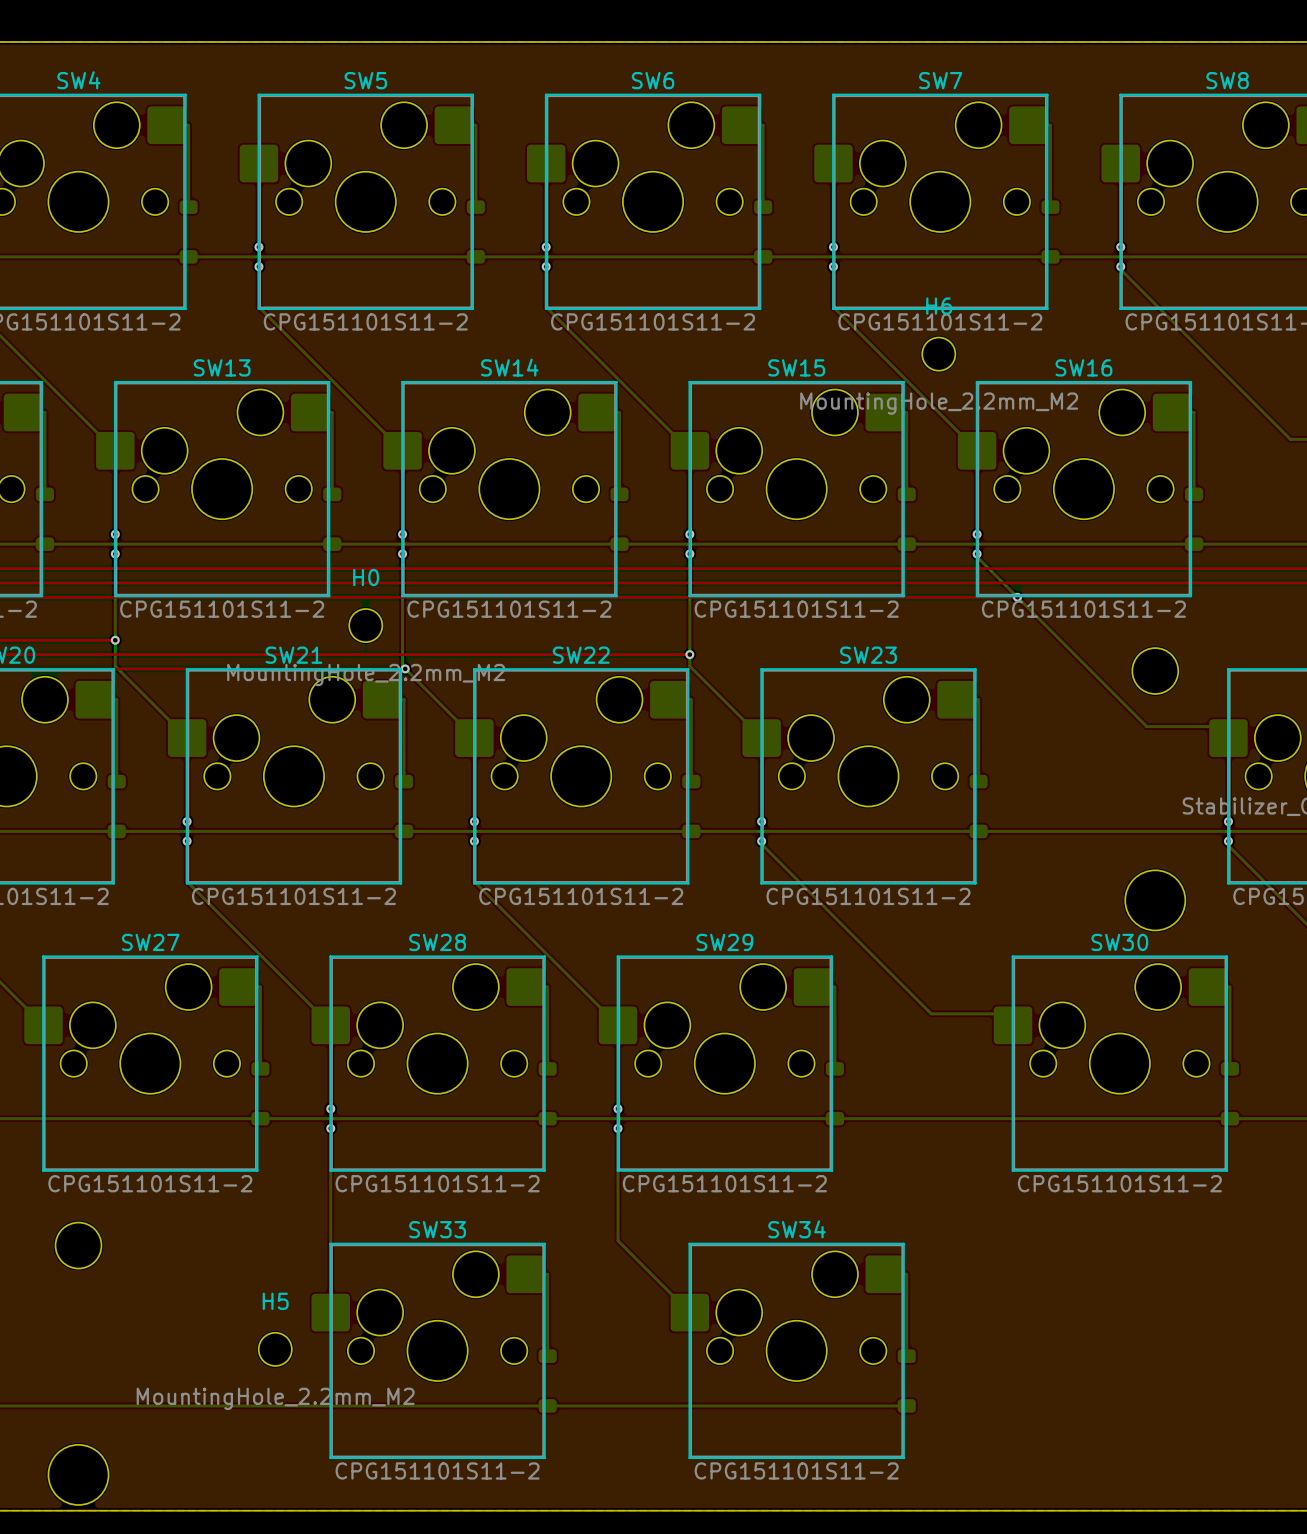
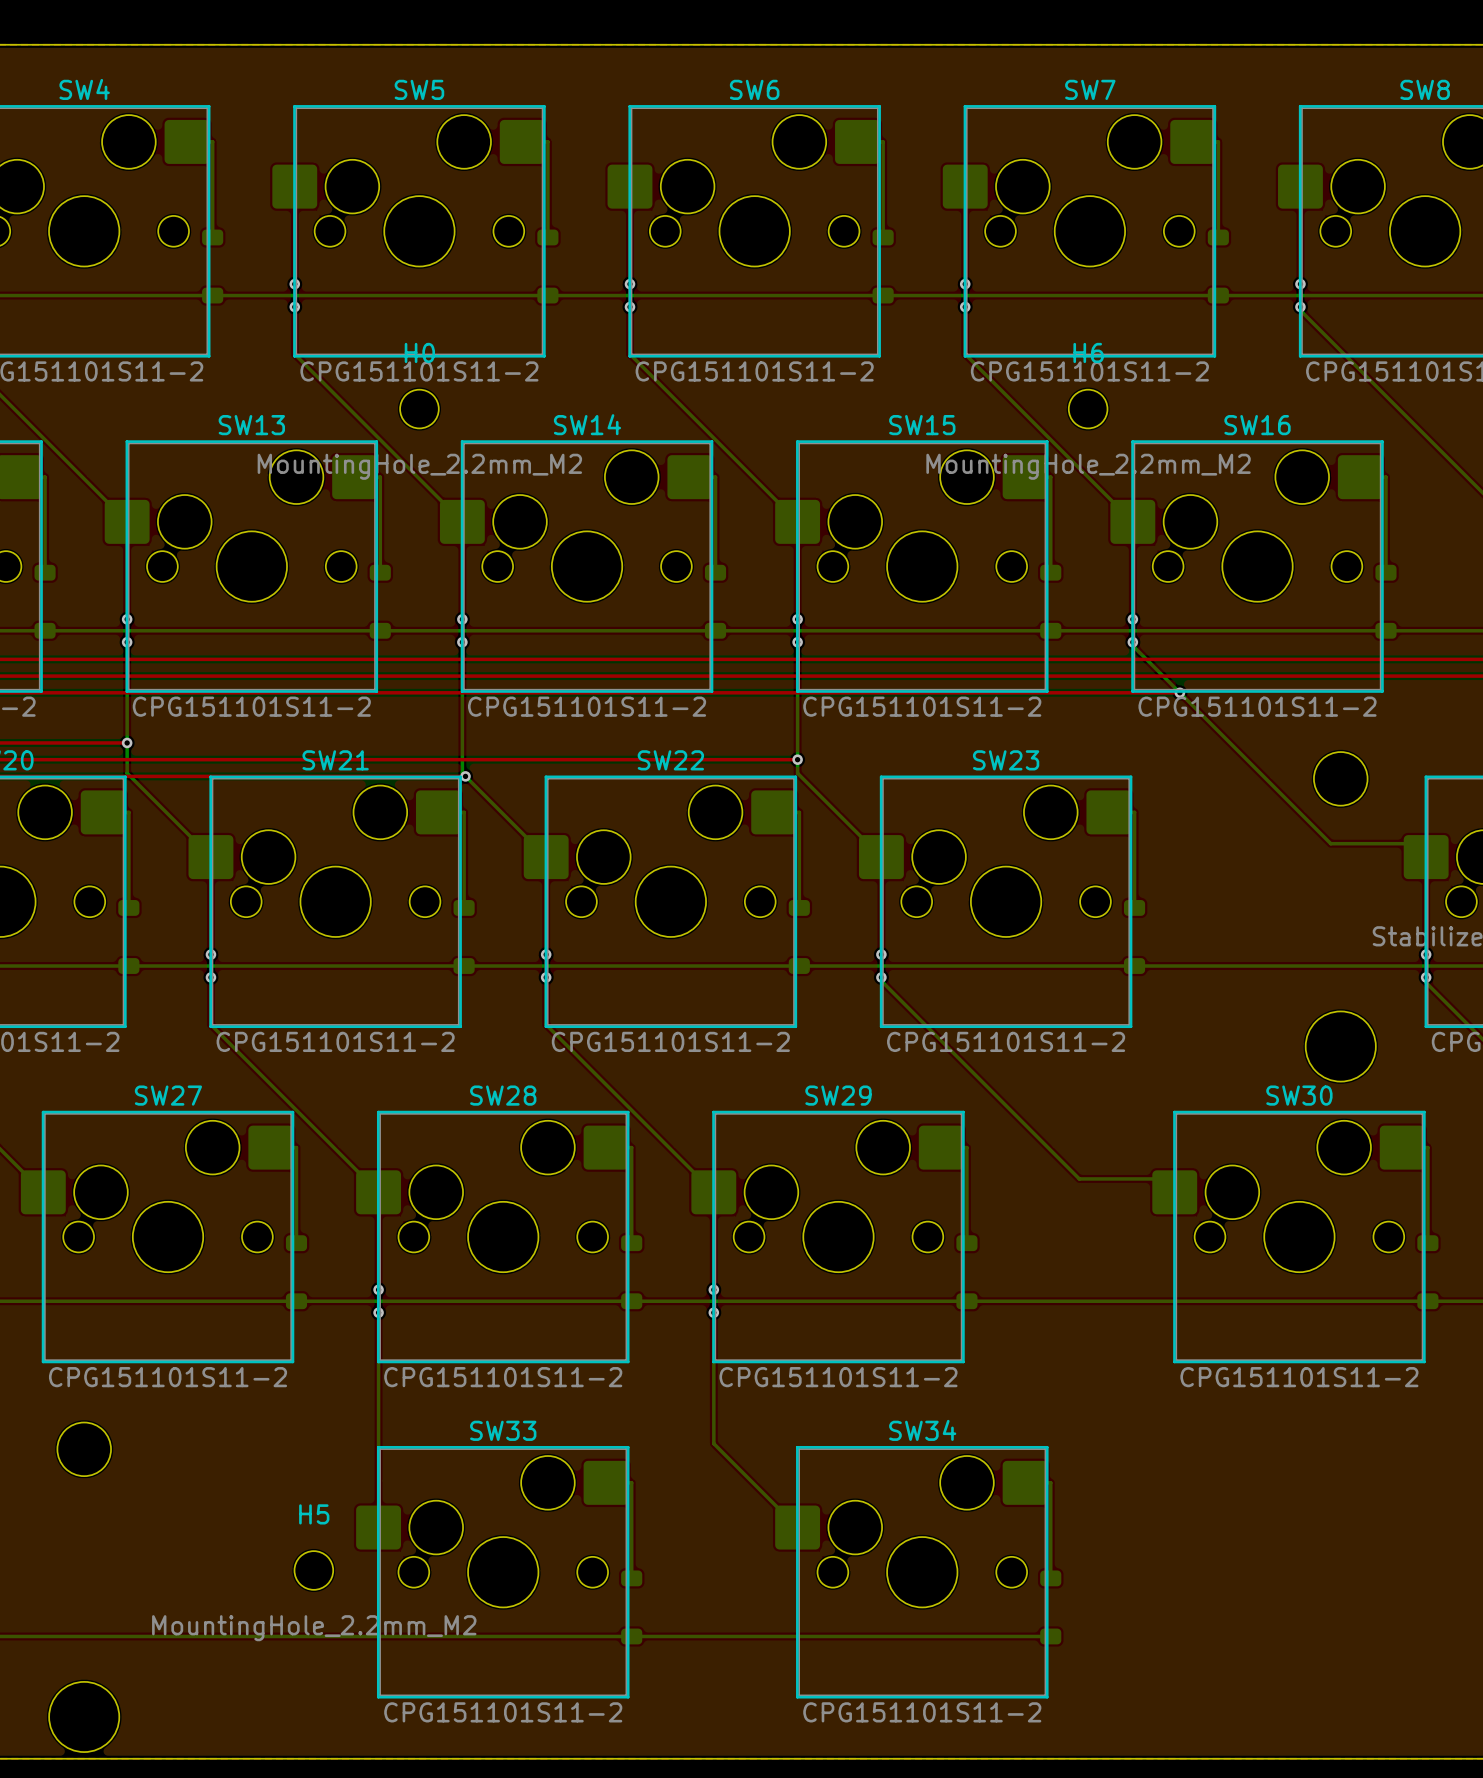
H0 position: (365, 625) -> (419, 409)

